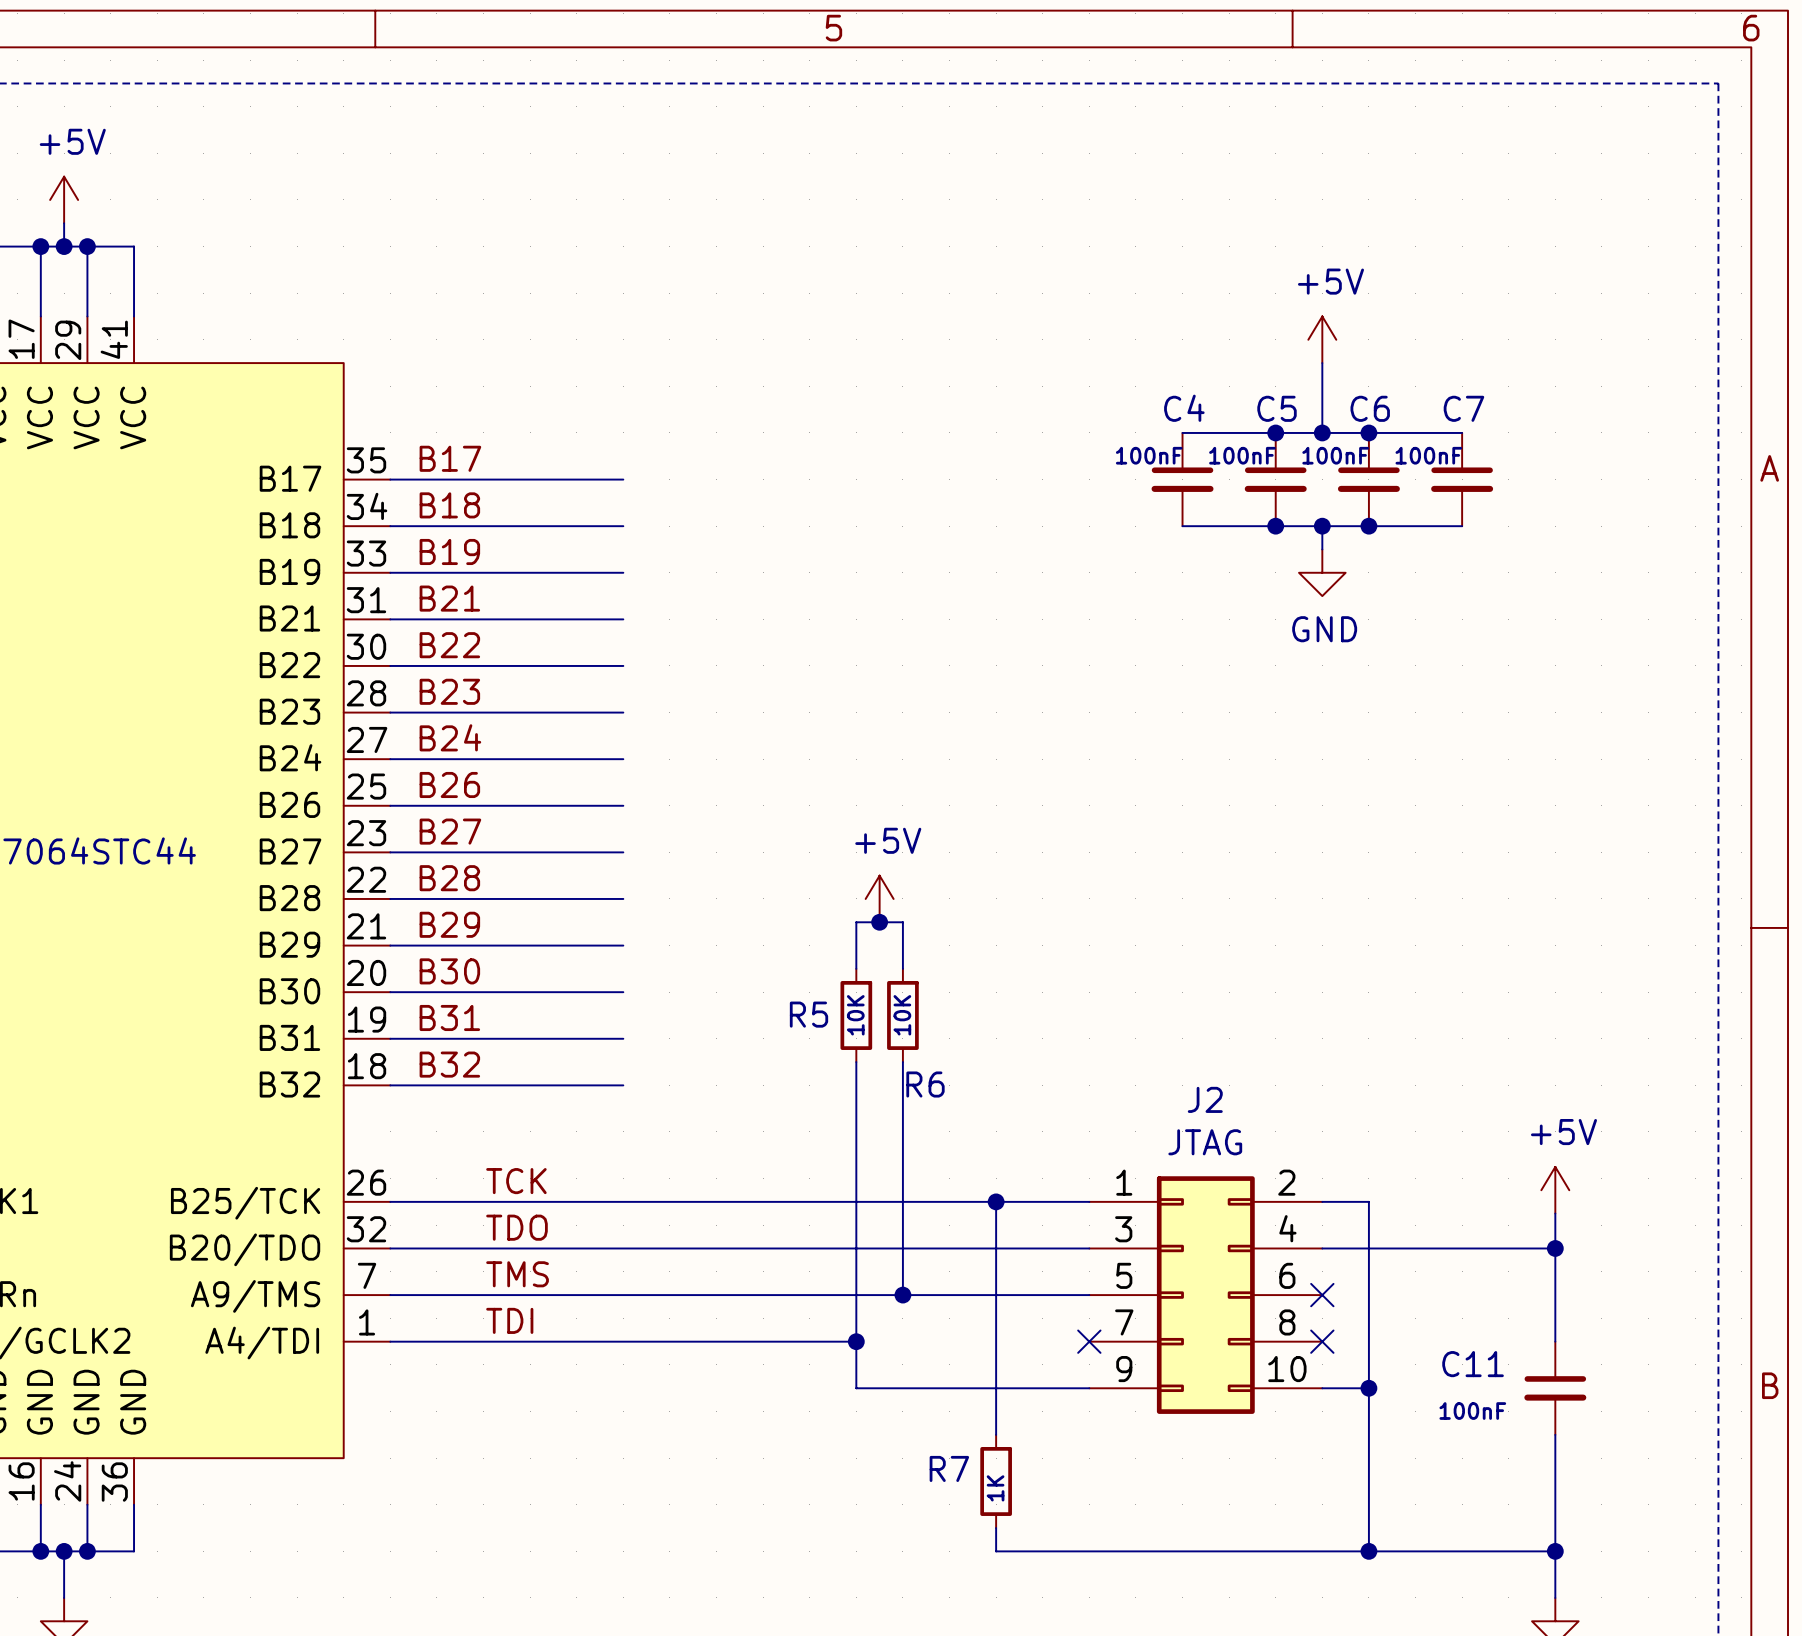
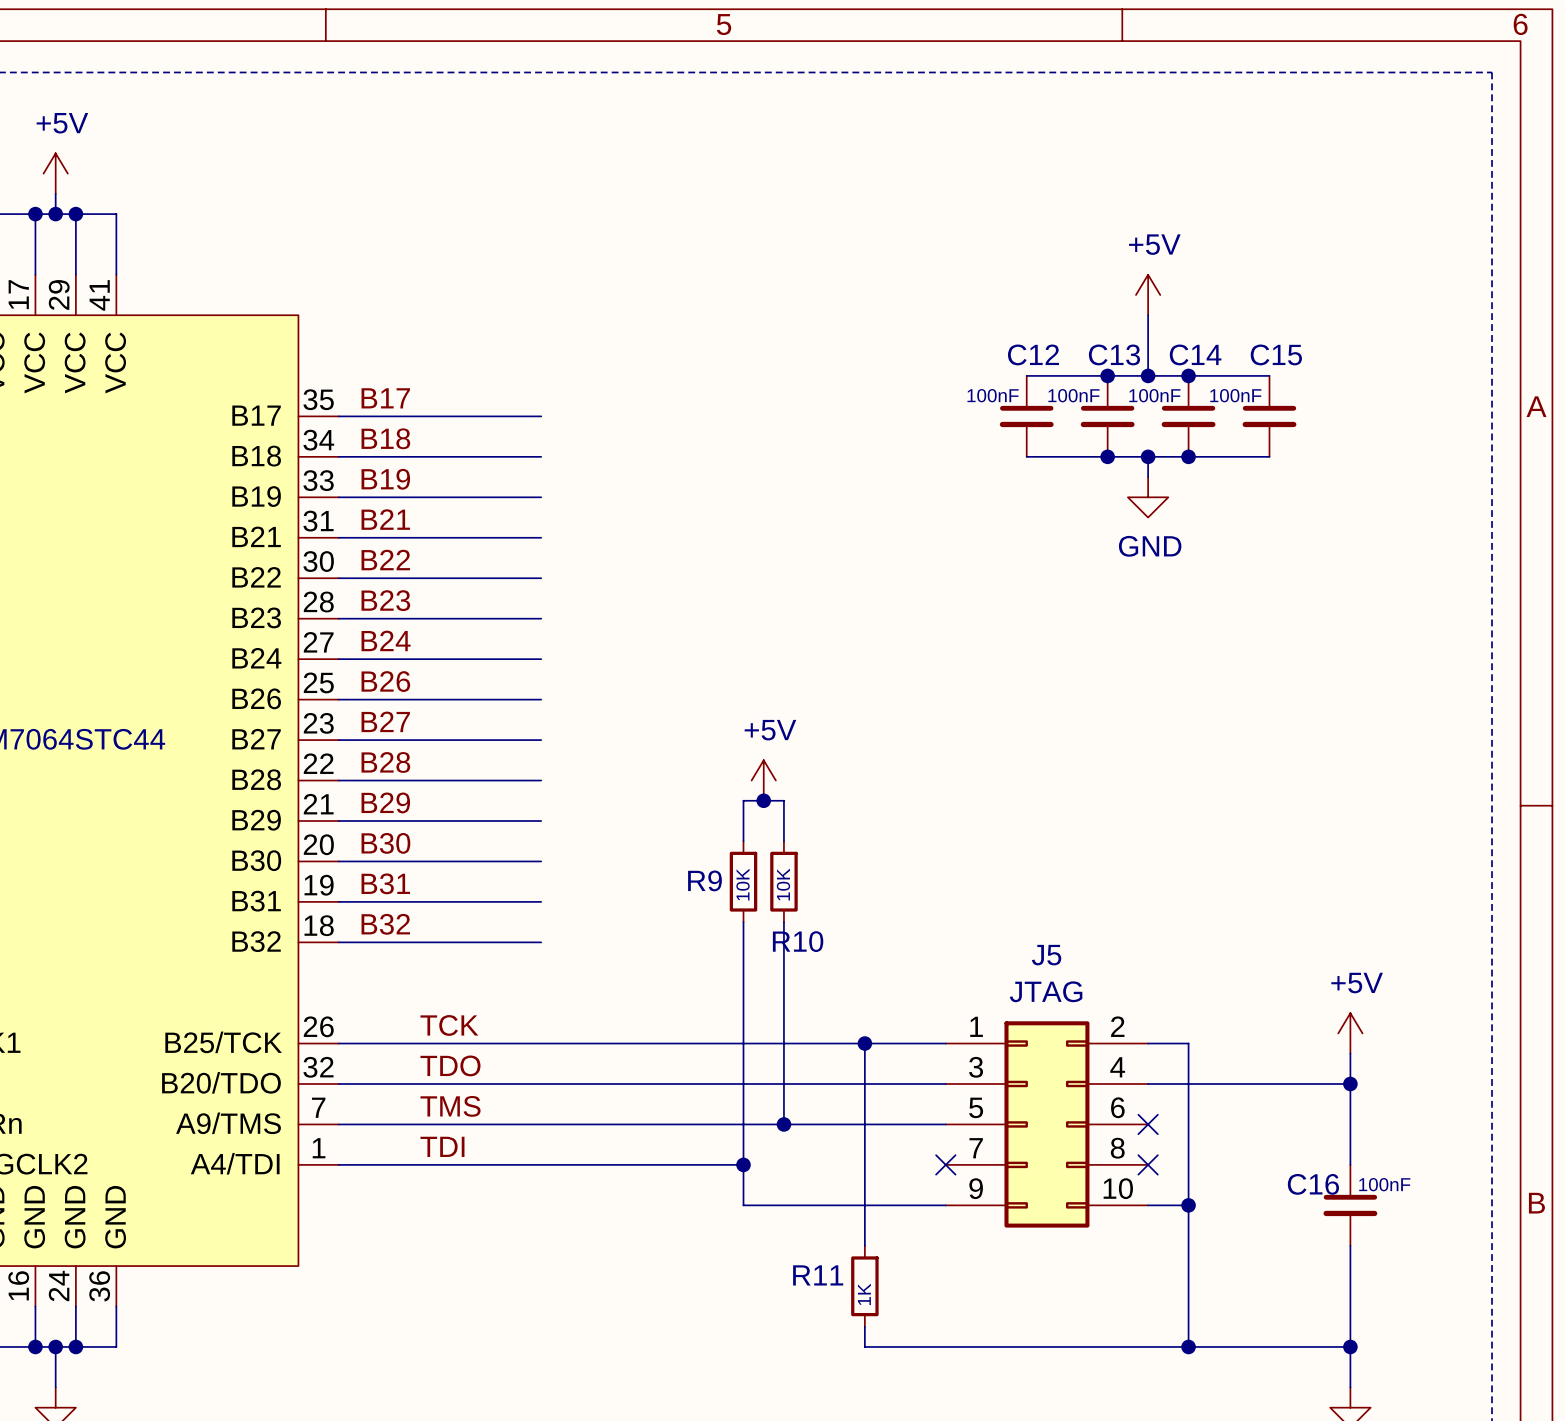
C4 name: C4 (1184, 408) -> C12 (1033, 354)
C5 name: C5 (1277, 408) -> C13 (1114, 354)
C6 name: C6 (1370, 408) -> C14 (1195, 354)
C7 name: C7 (1463, 408) -> C15 (1276, 354)
R5 name: R5 (808, 1014) -> R9 (704, 880)
R6 name: R6 (925, 1084) -> R10 (798, 941)
J2 name: J2 (1205, 1099) -> J5 (1046, 955)
C11 name: C11 (1473, 1364) -> C16 (1313, 1184)
C11 value position: 100nF (1472, 1411) -> 100nF (1384, 1184)
R7 name: R7 (949, 1468) -> R11 (818, 1275)

